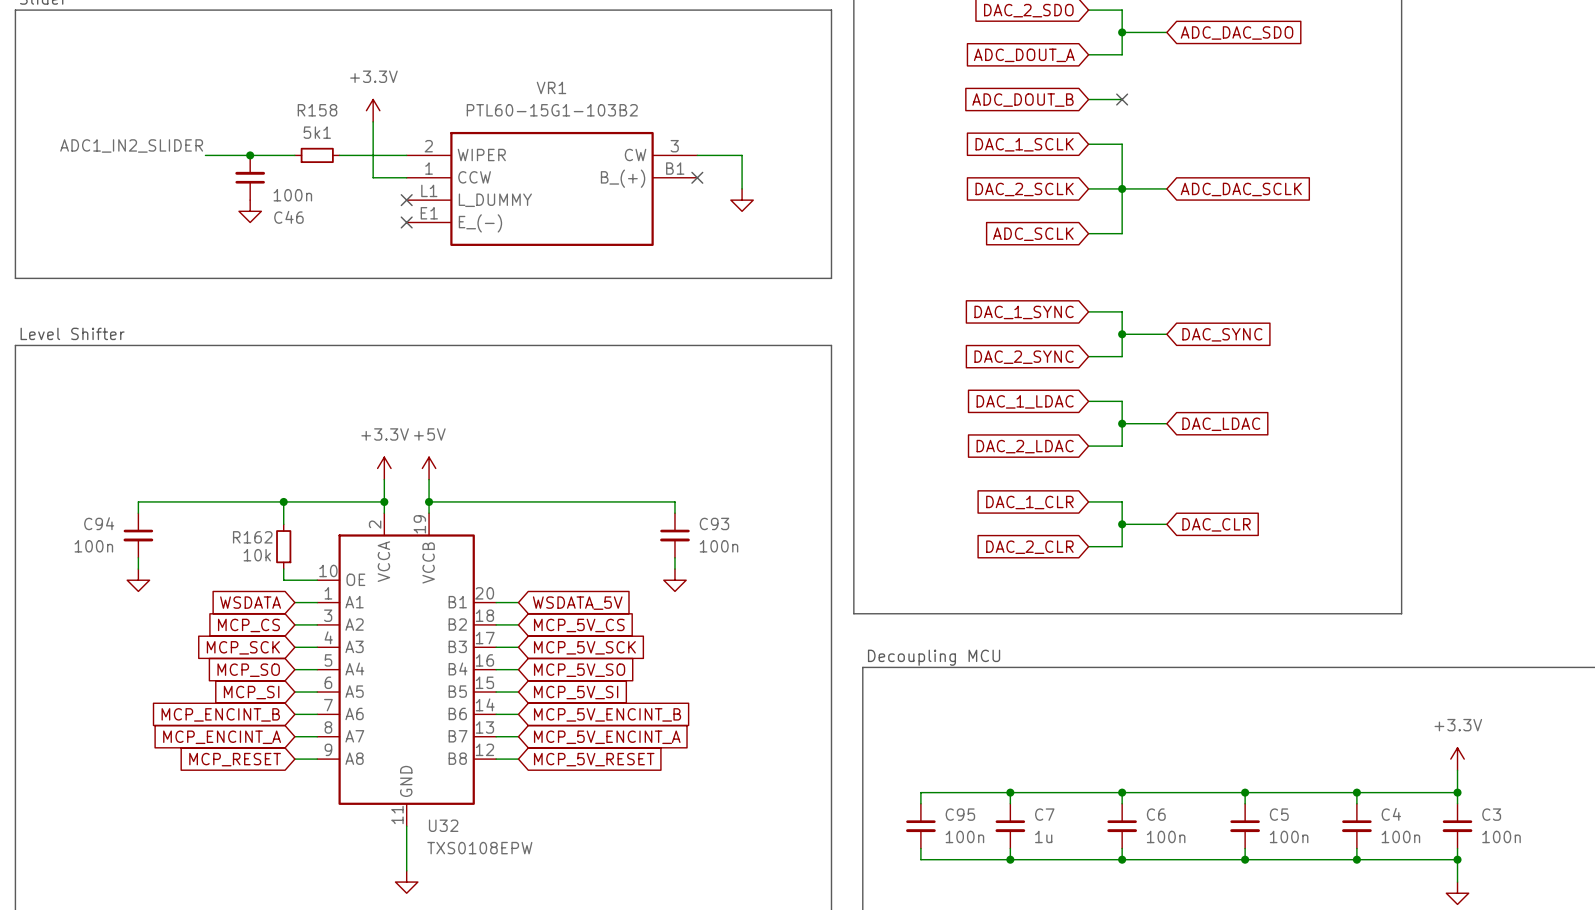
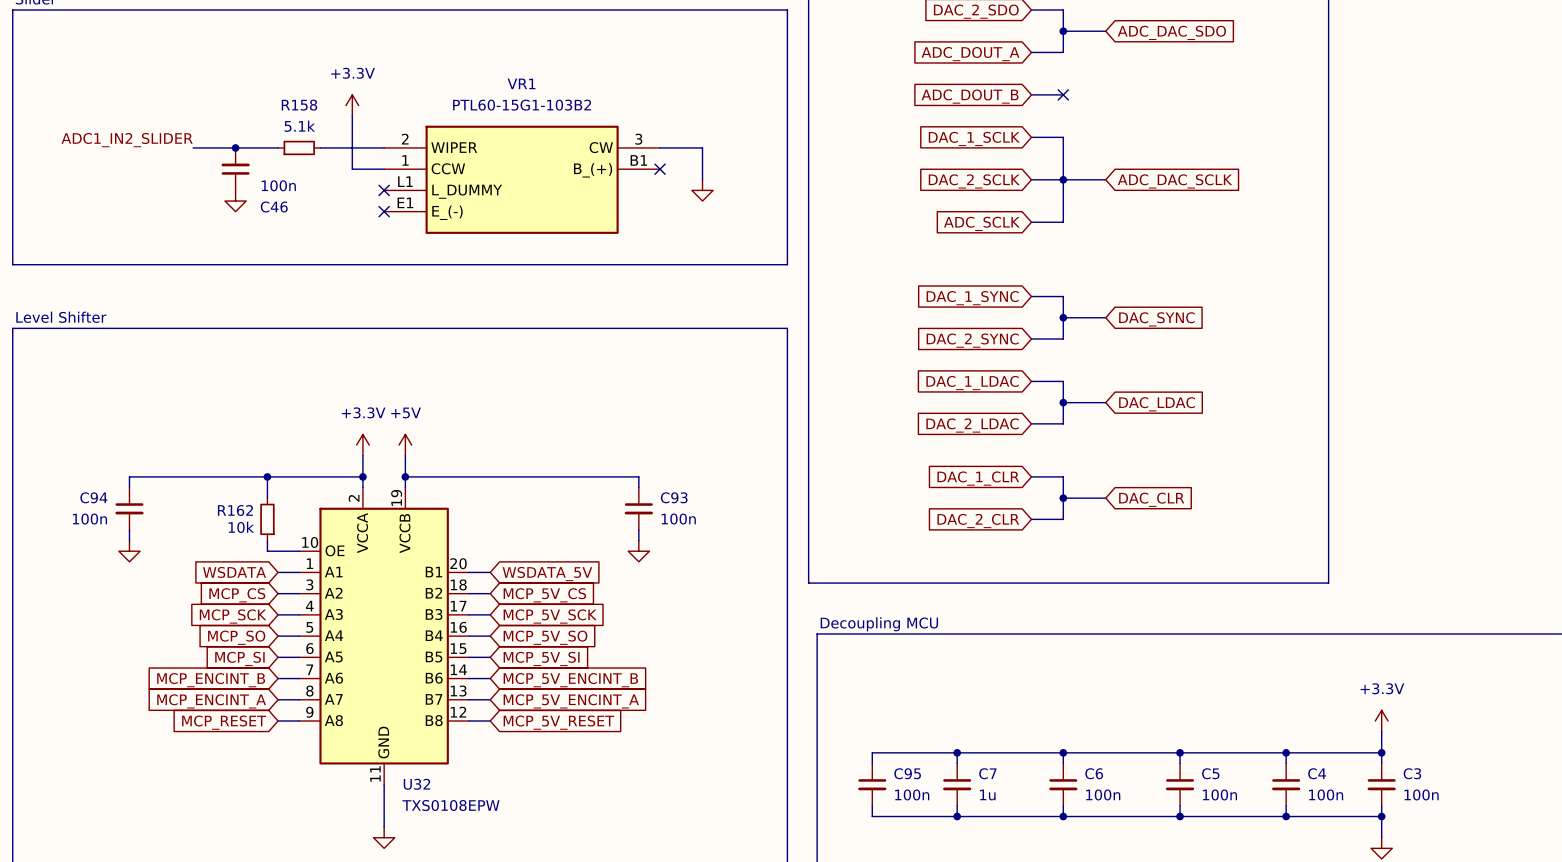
R158 value: 5k1 (317, 132) -> 5.1k (299, 126)

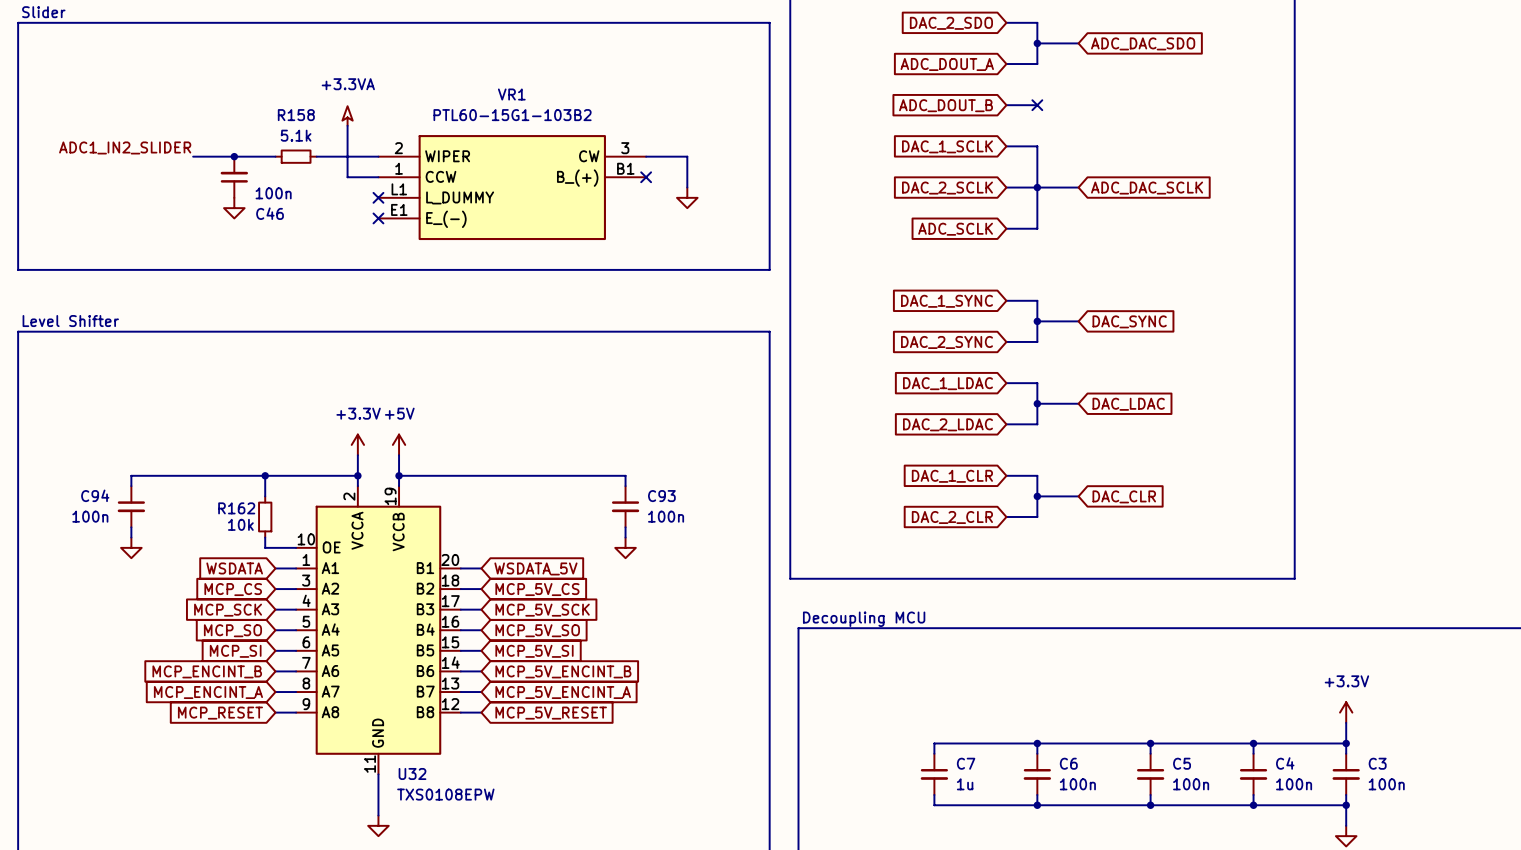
power symbol: +3.3V (352, 105) -> +3.3VA (347, 116)
wire: (957, 752) (872, 752) (872, 763) -> none
junction: (957, 752) -> none
C95: 100n (872, 784) -> none
wire: (872, 805) (872, 816) (957, 816) -> none
junction: (957, 816) -> none

